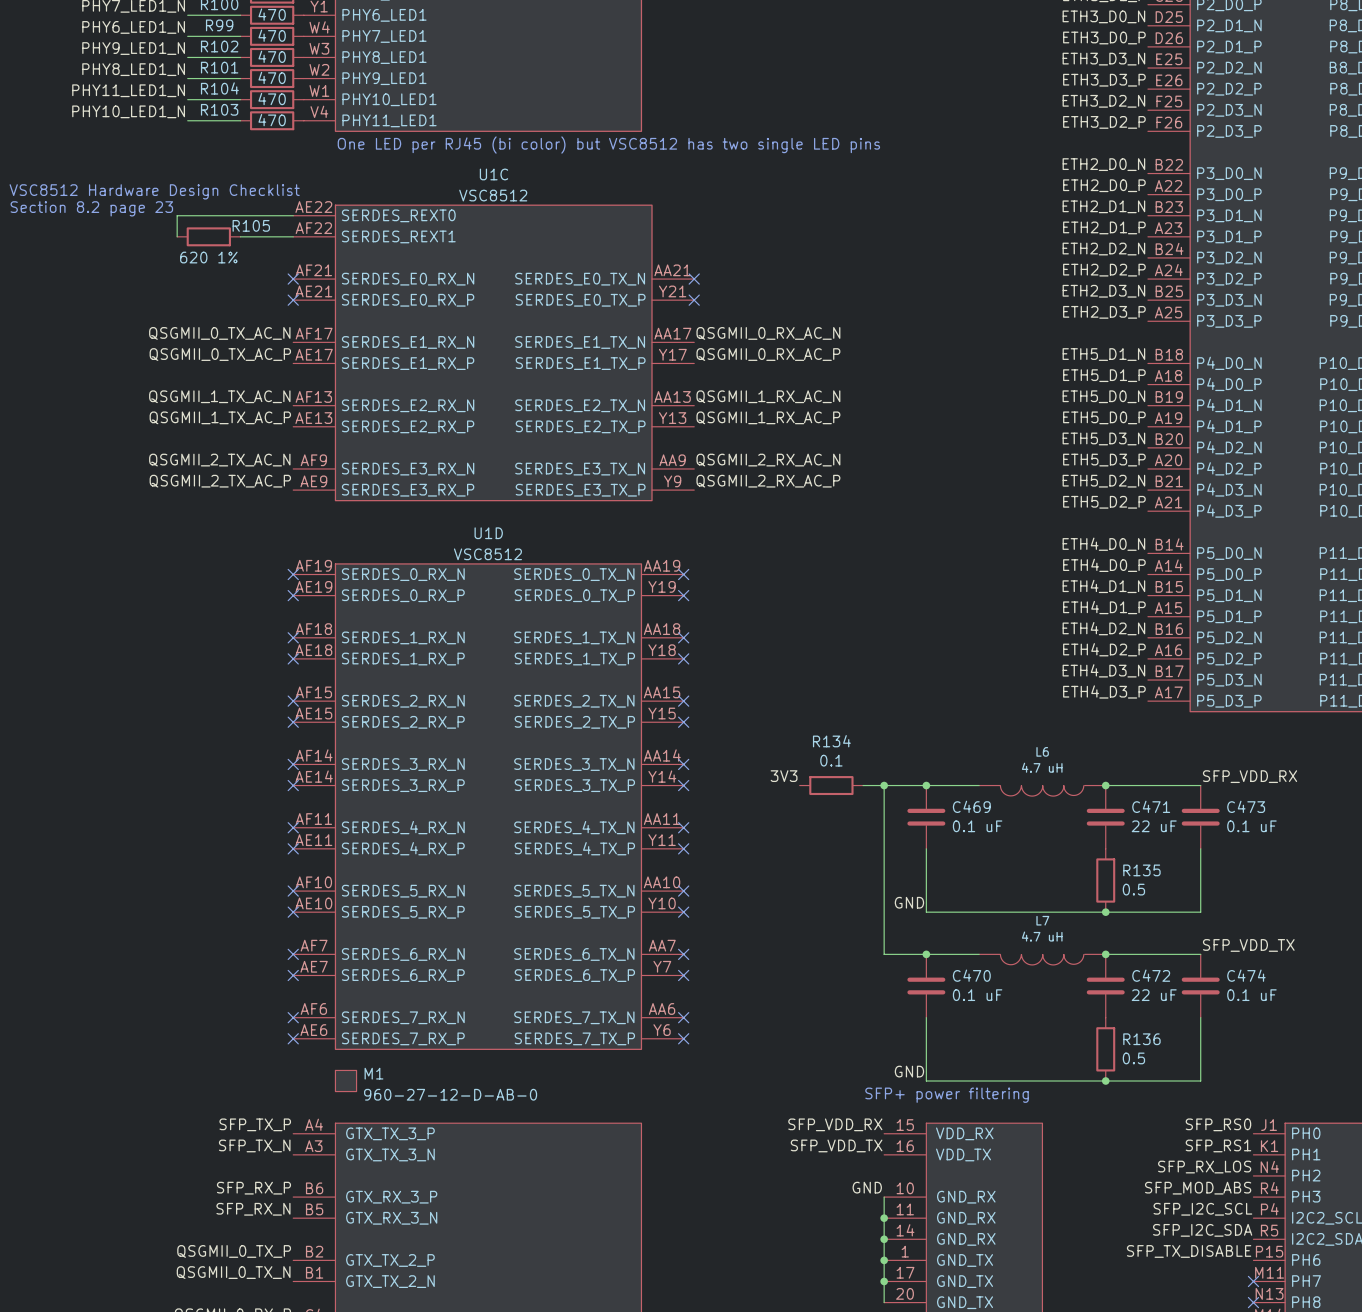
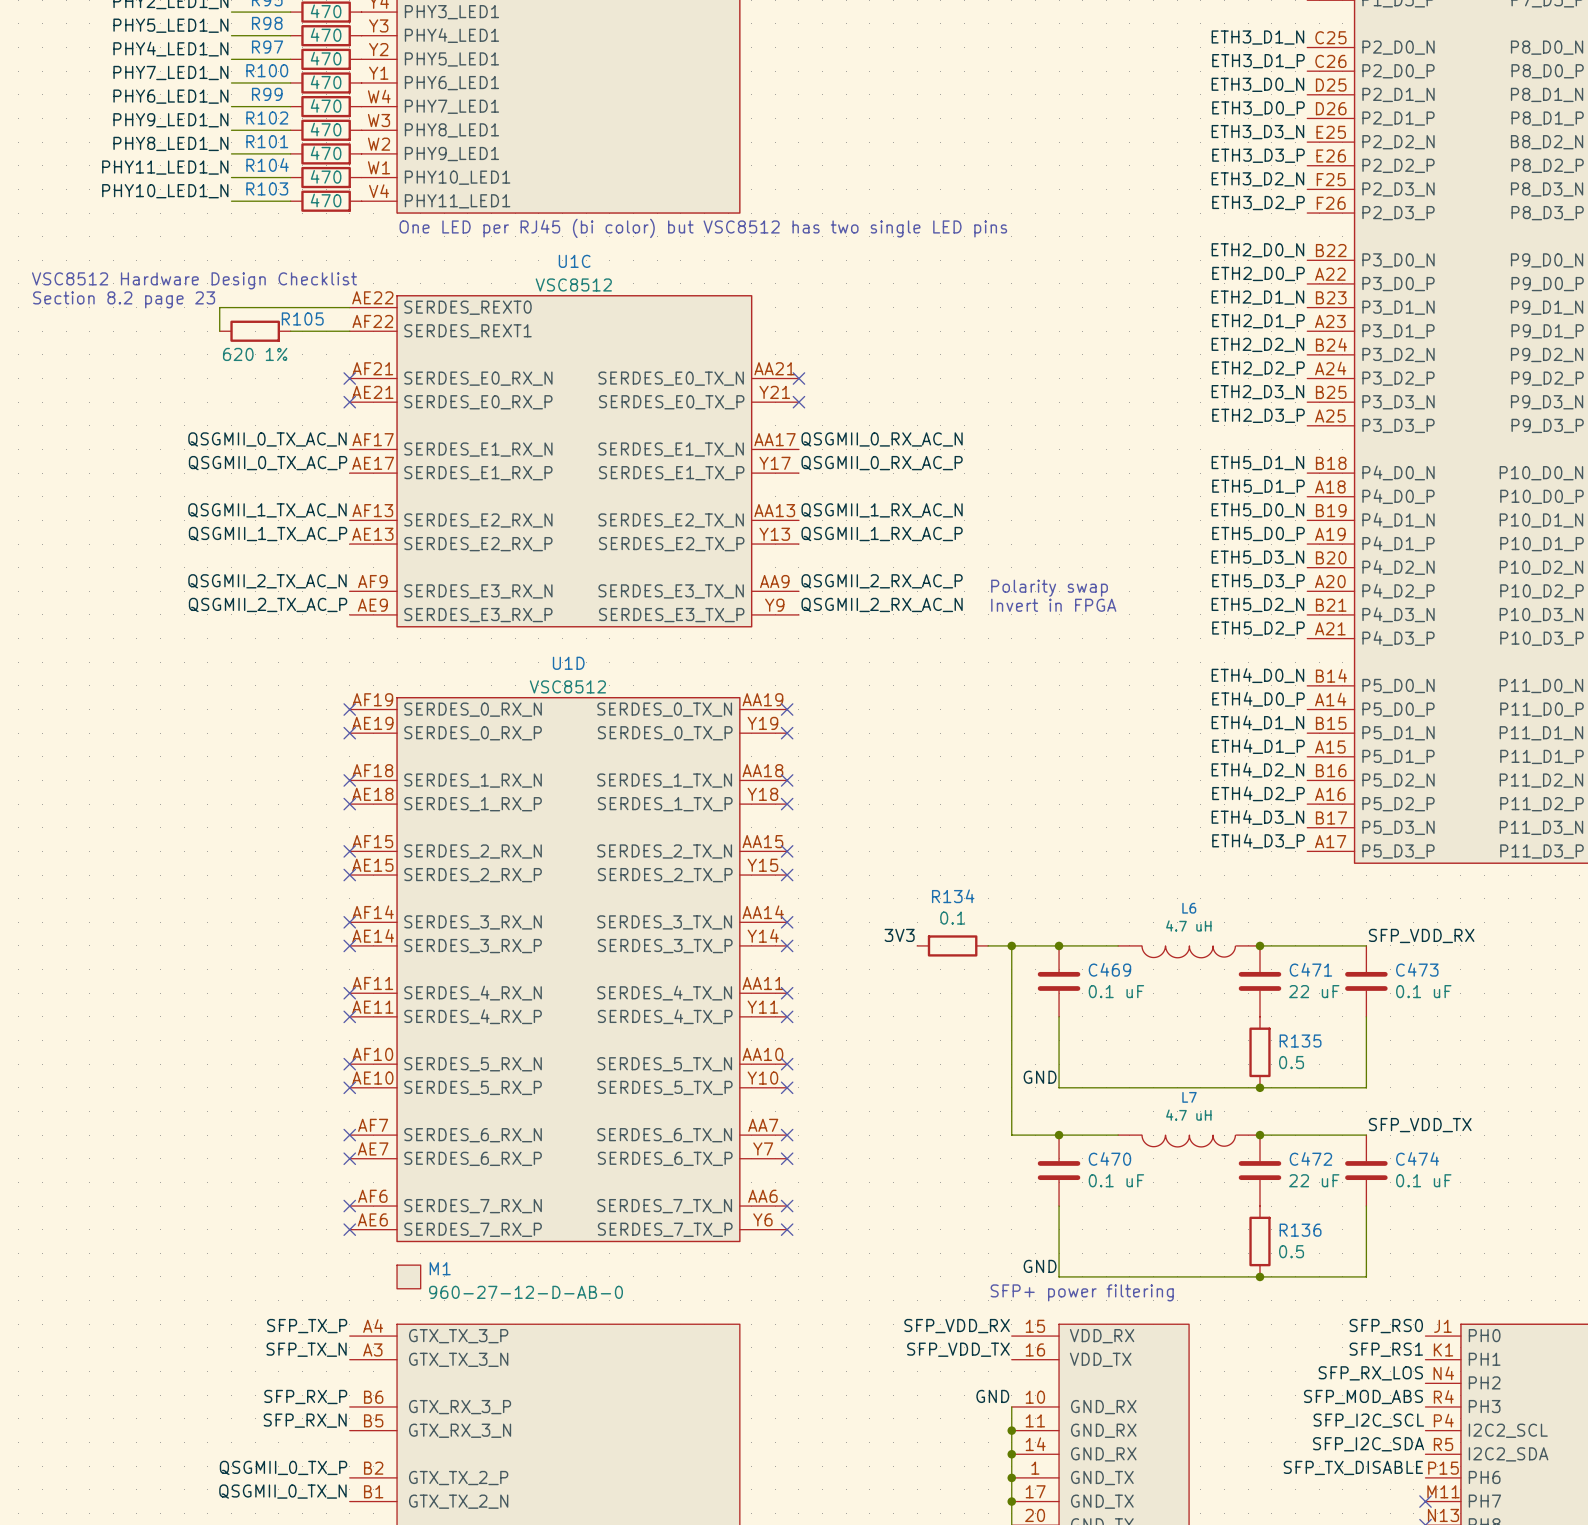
label: QSGMII_2_RX_AC_N (768, 460) -> QSGMII_2_RX_AC_P (882, 581)
text: none -> Polarity swap (1049, 588)
label: QSGMII_2_RX_AC_P (768, 481) -> QSGMII_2_RX_AC_N (882, 604)
text: none -> Invert in FPGA (1053, 605)

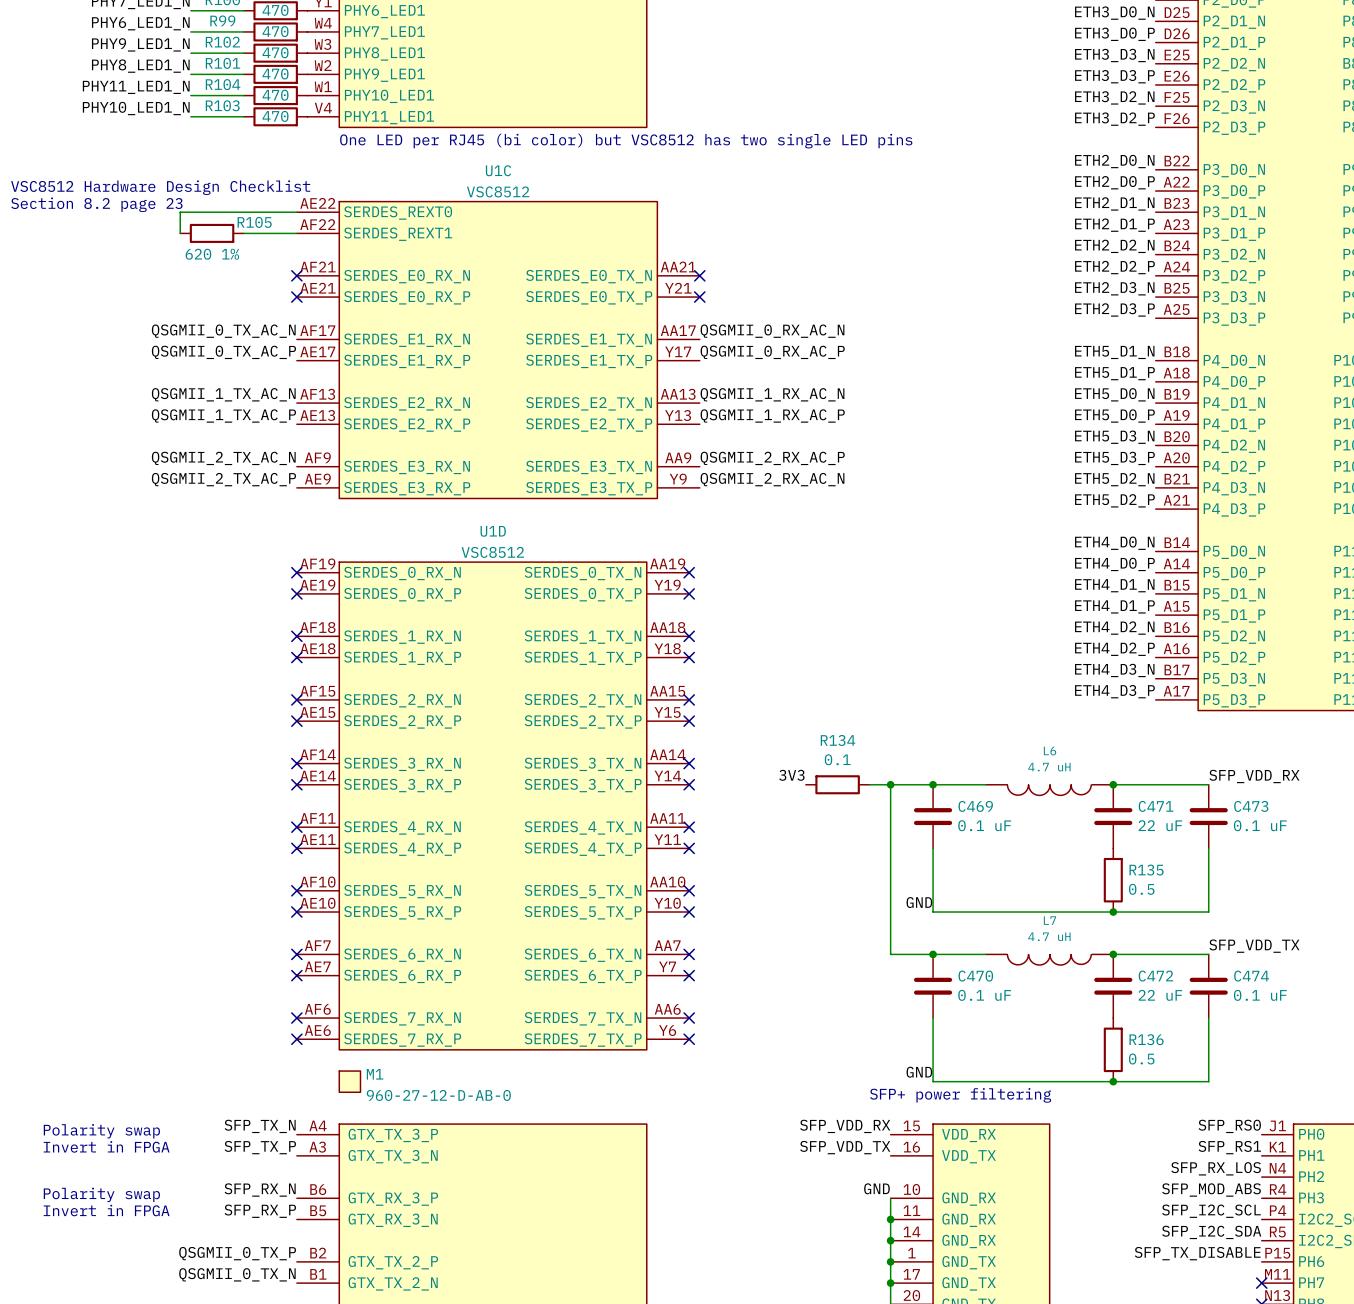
text: Polarity swap (1049, 588) -> none
text: Invert in FPGA (1053, 605) -> none
label: SFP_TX_P (307, 1326) -> SFP_TX_N (260, 1126)
text: none -> Polarity swap (101, 1131)
label: SFP_TX_N (306, 1349) -> SFP_TX_P (260, 1147)
text: none -> Invert in FPGA (106, 1146)
label: SFP_RX_P (305, 1396) -> SFP_RX_N (260, 1190)
text: none -> Polarity swap (101, 1194)
text: none -> Invert in FPGA (106, 1210)
label: SFP_RX_N (305, 1420) -> SFP_RX_P (260, 1211)

